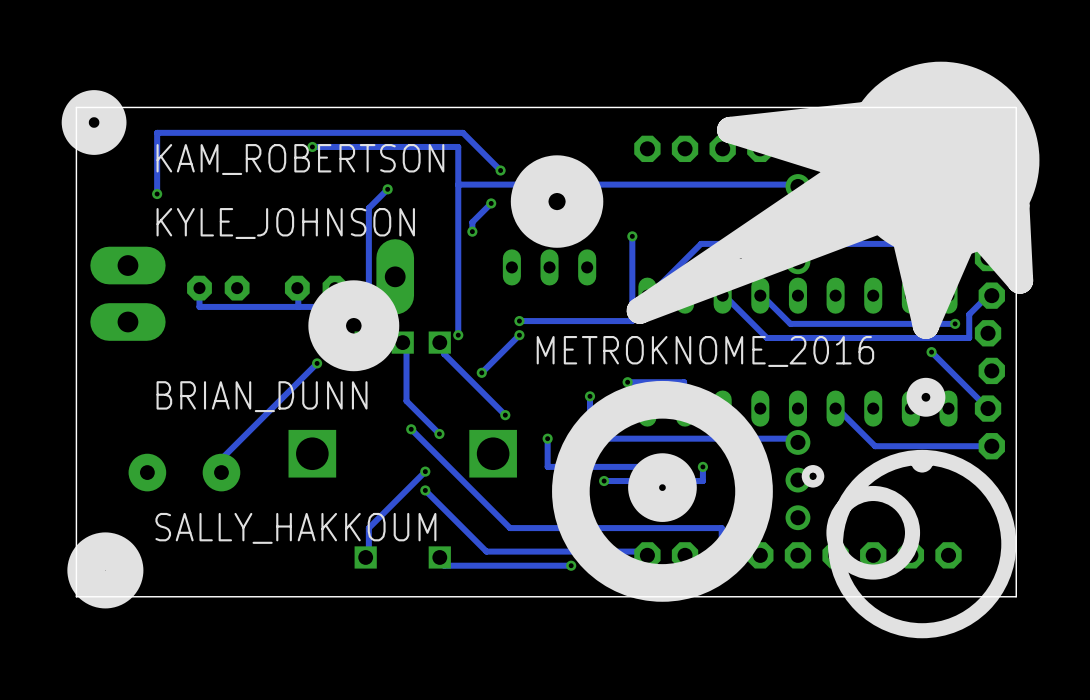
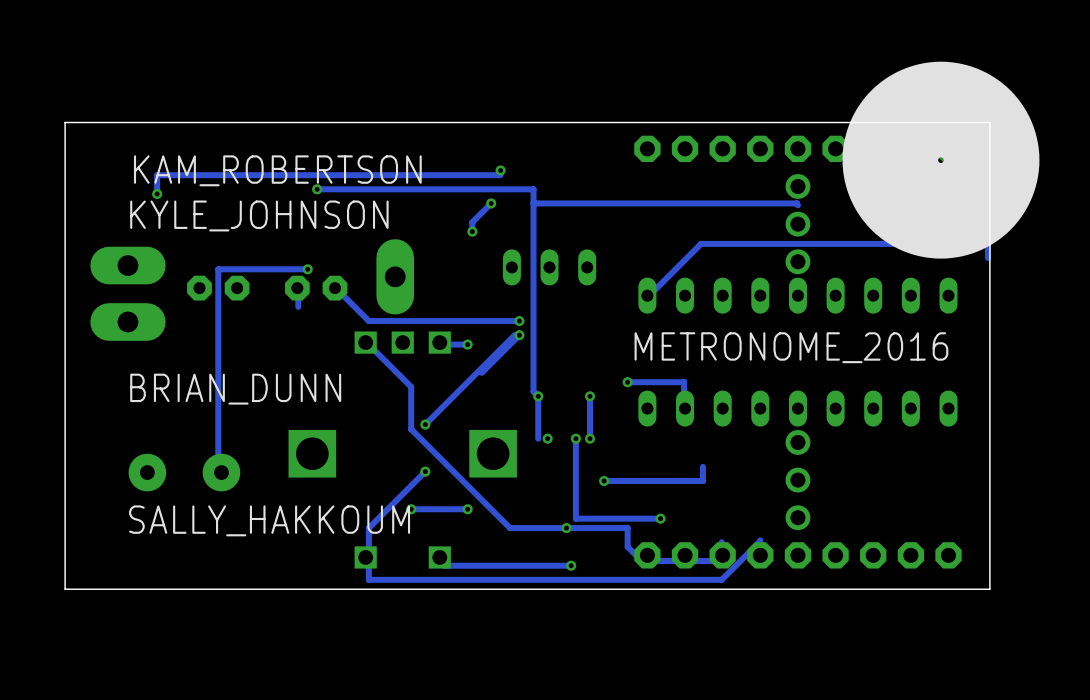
drawing: [61, 90, 127, 155] -> none
board edge: (1016, 107) (76, 107) (76, 596) (1016, 596) -> none
board edge: (1016, 107) (1016, 596) -> none
board edge: none -> (989, 122) (65, 122) (65, 589) (989, 589)
board edge: none -> (989, 122) (989, 589)
track: (312, 146) (458, 146) (458, 335) -> none
via: (312, 146) -> none
drawing: [510, 155, 604, 248] -> none
text position: KAM_ROBERTSON (300, 159) -> KAM_ROBERTSON (277, 170)
track: (500, 170) (462, 132) (157, 132) (157, 175) -> (500, 175) (157, 175)
track: (458, 184) (797, 184) (797, 186) -> none
track: none -> (317, 189) (533, 189) (533, 391) (538, 396) (538, 438)
via: none -> (317, 189)
track: (387, 189) (368, 208) (368, 306) -> none
via: (387, 189) -> none
line: (959, 194) (952, 152) (884, 194) (1004, 246) (1016, 205) (1020, 280) (967, 220) (933, 276) (940, 201) (752, 250) (831, 224) (764, 258) (835, 186) (831, 216) (858, 212) (846, 148) (805, 141) (816, 148) (865, 114) (730, 130) (850, 167) (639, 310) (899, 212) (925, 325) (963, 239) -> none
track: none -> (533, 203) (797, 203) (797, 205)
text position: KYLE_JOHNSON (285, 223) -> KYLE_JOHNSON (259, 215)
track: (632, 236) (632, 321) (519, 321) -> (334, 288) (368, 321) (519, 321)
via: (632, 236) -> none
via: none -> (307, 269)
drawing: [308, 280, 400, 372] -> none
track: (199, 288) (199, 306) (368, 306) -> none
track: (760, 295) (790, 323) (955, 323) -> none
track: (991, 295) (988, 295) (969, 314) (969, 337) (766, 337) (722, 295) -> none
track: (368, 306) (406, 344) (406, 401) (439, 433) -> none
via: (955, 323) -> none
via position: (458, 335) -> (467, 344)
track: none -> (514, 335) (425, 424)
track: none -> (365, 342) (411, 386) (411, 429)
track: (444, 344) (444, 353) (505, 415) -> (444, 344) (467, 344)
text: METROKNOME_2016 (705, 351) -> METRONOME_2016 (791, 347)
track: (931, 352) (988, 408) -> none
via: (931, 352) -> none
part: (989, 352) -> none
track: (317, 363) (223, 457) (221, 472) -> (307, 269) (218, 269) (218, 471) (221, 472)
via: (317, 363) -> none
via: (481, 372) -> none
drawing: [906, 377, 946, 417] -> none
drawing: [552, 380, 773, 602] -> none
text position: BRIAN_DUNN (262, 396) -> BRIAN_DUNN (235, 389)
via: none -> (538, 396)
track: (835, 408) (875, 446) (991, 446) -> none
via: (505, 415) -> none
via: none -> (425, 424)
via: (411, 429) -> none
via: (439, 433) -> none
track: (547, 438) (547, 466) (665, 466) -> none
track: none -> (575, 438) (575, 518) (660, 518)
via: none -> (575, 438)
track: (589, 438) (797, 438) (797, 442) -> none
drawing: [801, 449, 1017, 639] -> none
via: (702, 466) -> none
track: (425, 490) (486, 551) (646, 551) (647, 555) -> none
via: (425, 490) -> none
via: none -> (411, 509)
track: none -> (467, 509) (411, 509)
via: none -> (467, 509)
via: none -> (660, 518)
text position: SALLY_HAKKOUM (295, 528) -> SALLY_HAKKOUM (269, 520)
track: (627, 528) (721, 528) (721, 542) -> (627, 528) (627, 546) (641, 561) (721, 561) (721, 551)
drawing: [67, 532, 144, 609] -> none
track: none -> (760, 540) (721, 579) (368, 579) (368, 561) (365, 557)

